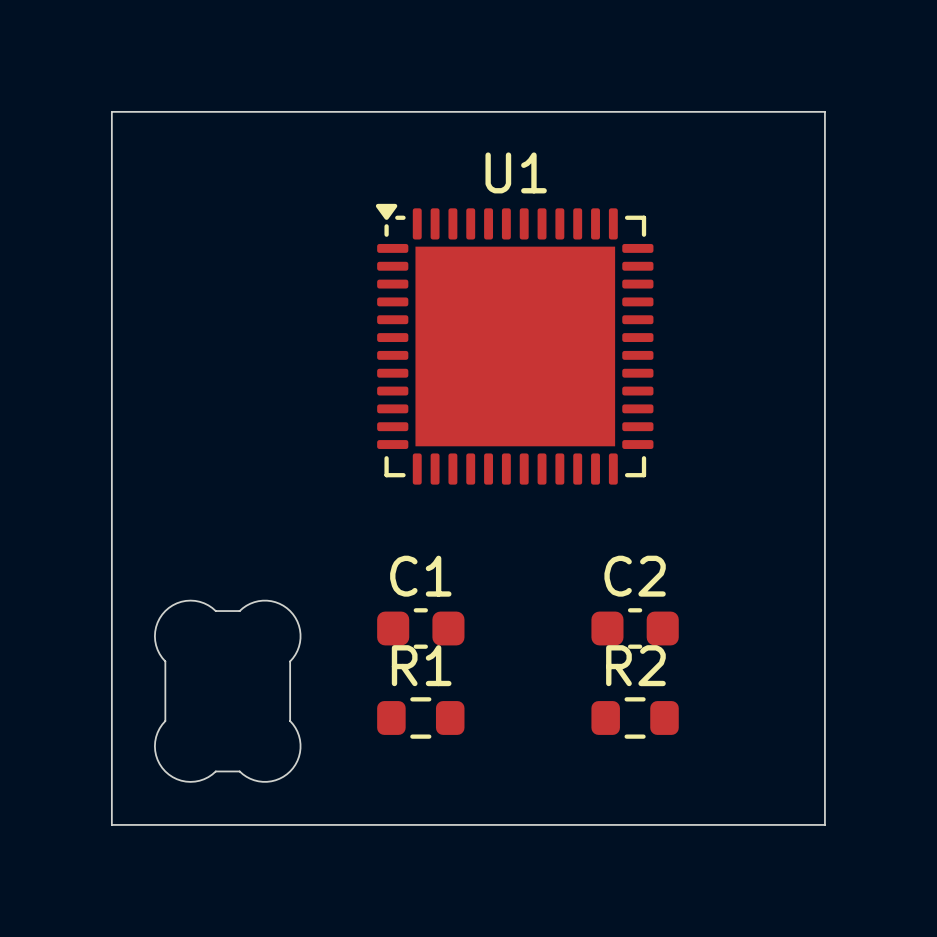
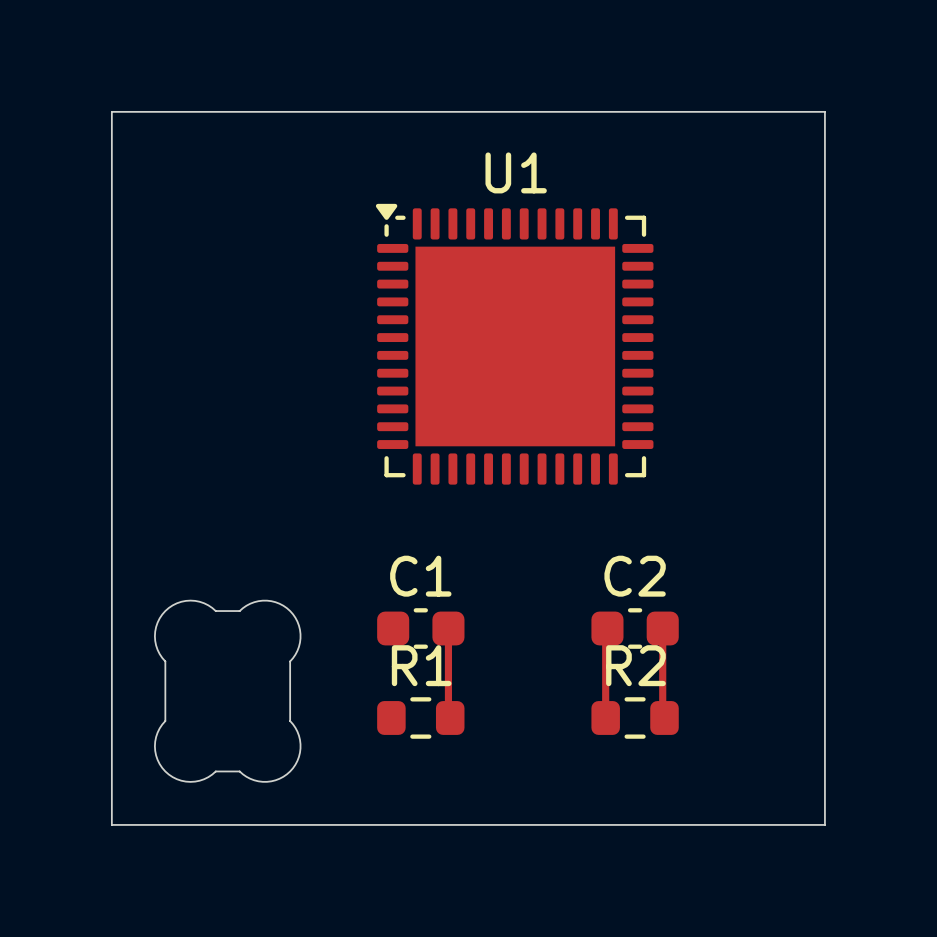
track: none -> (448, 628) (448, 716) (450, 717)
track: none -> (607, 628) (605, 630) (605, 717)
track: none -> (662, 628) (662, 716) (664, 717)

